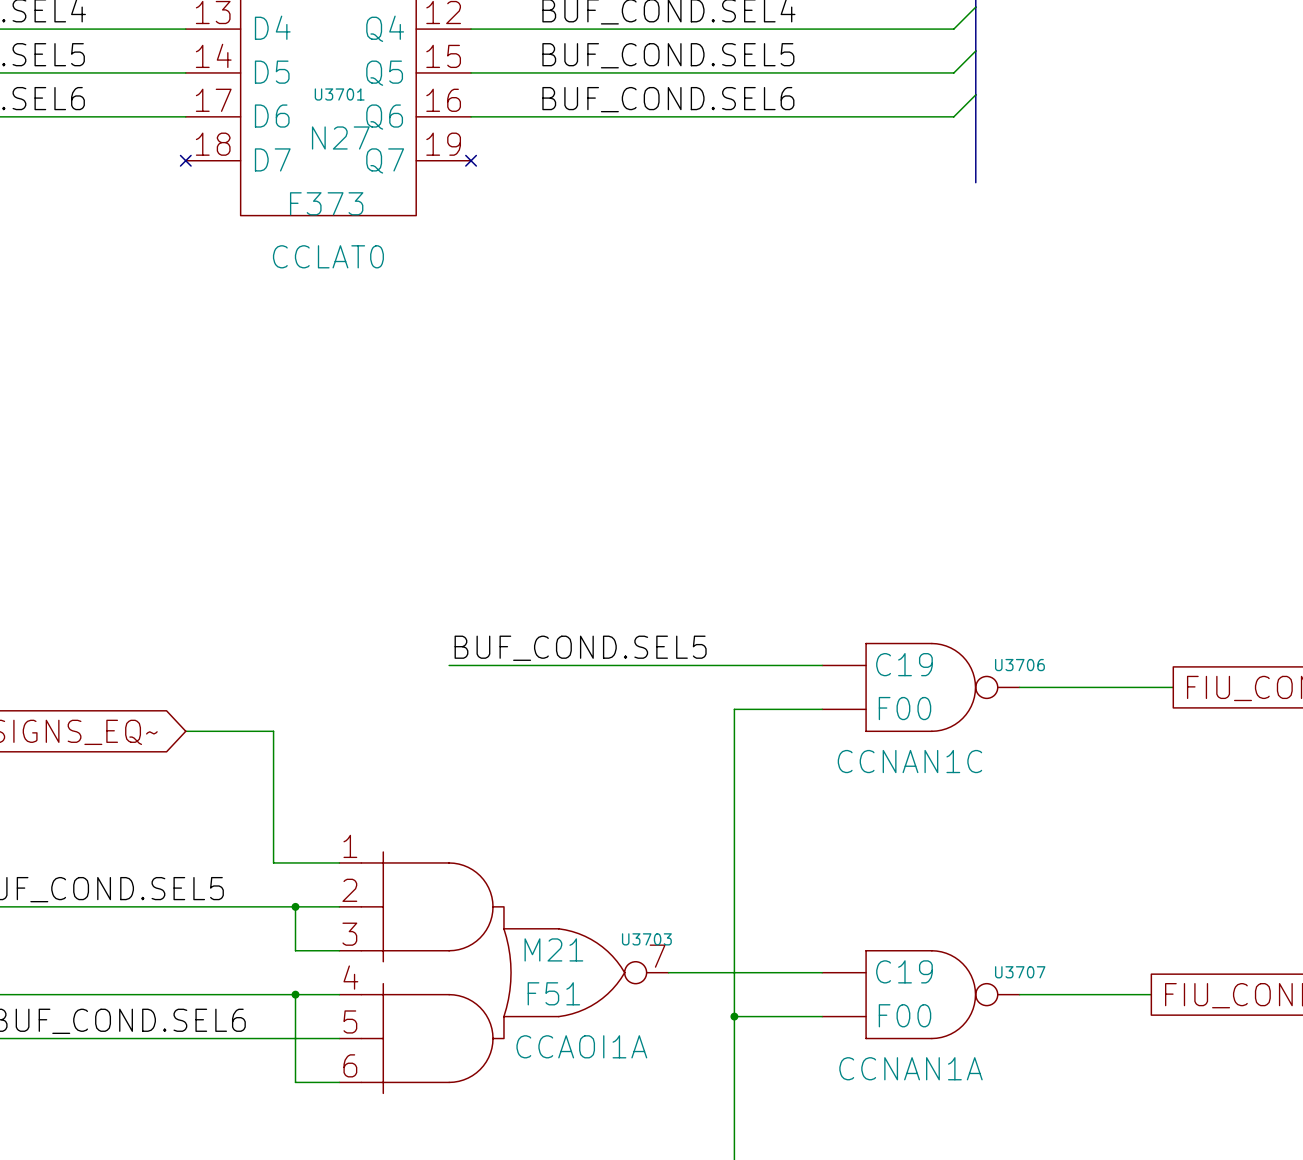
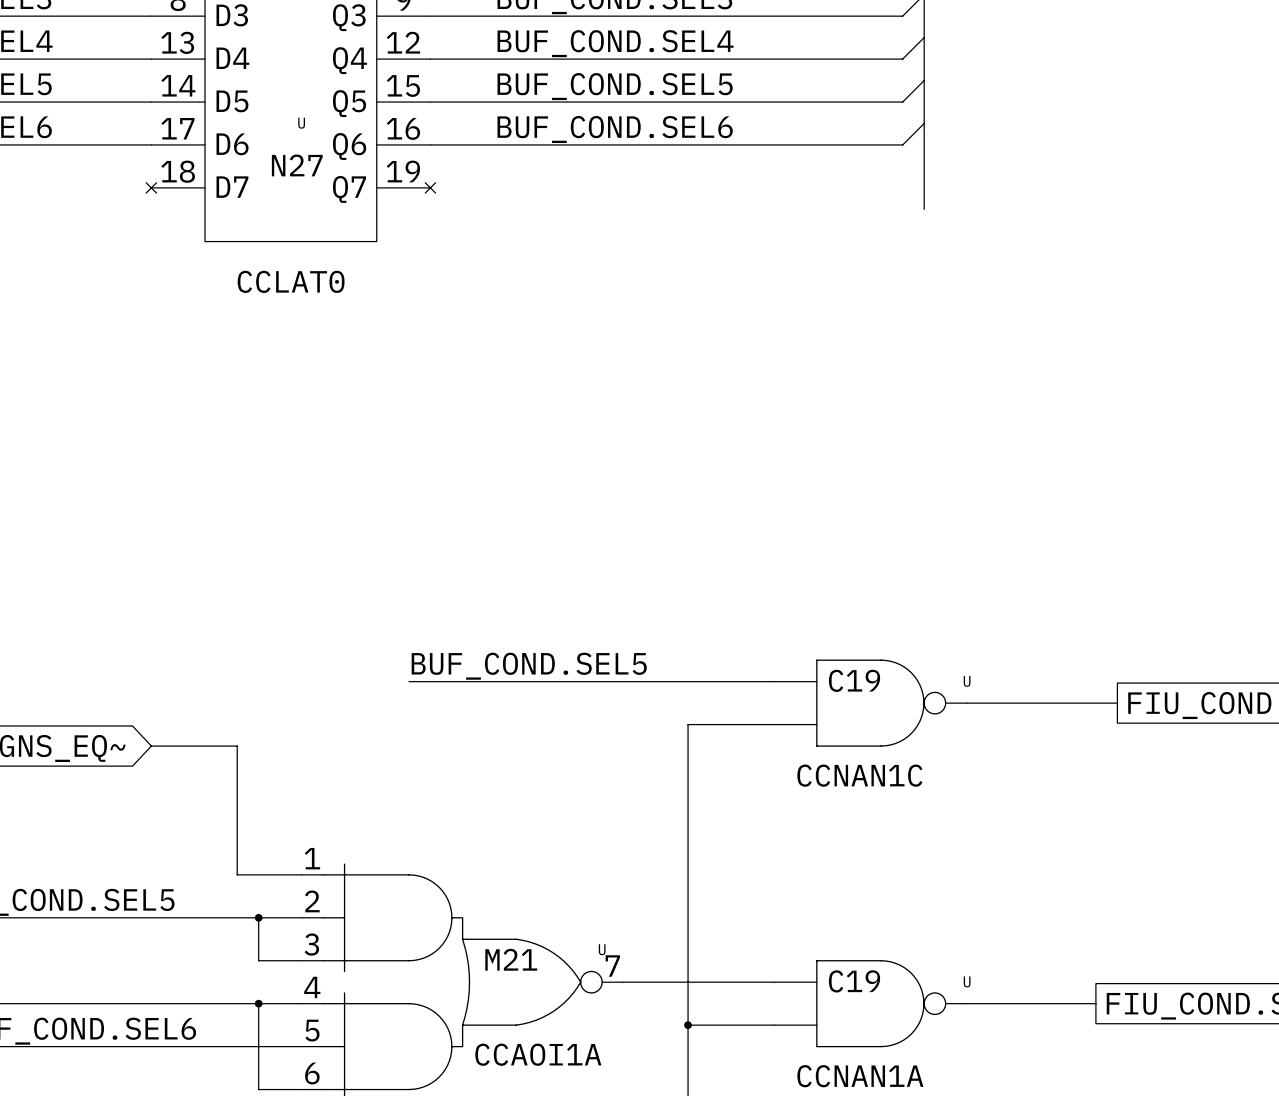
U3701 name: U3701 (339, 94) -> U (301, 123)
U3701 value: F373 (326, 203) -> none
U3706 name: U3706 (1019, 665) -> U (967, 681)
U3706 value: F00 (904, 708) -> none
U3703 name: U3703 (646, 939) -> U (602, 949)
U3707 name: U3707 (1020, 972) -> U (967, 981)
U3703 value: F51 (553, 993) -> none
U3707 value: F00 (904, 1015) -> none

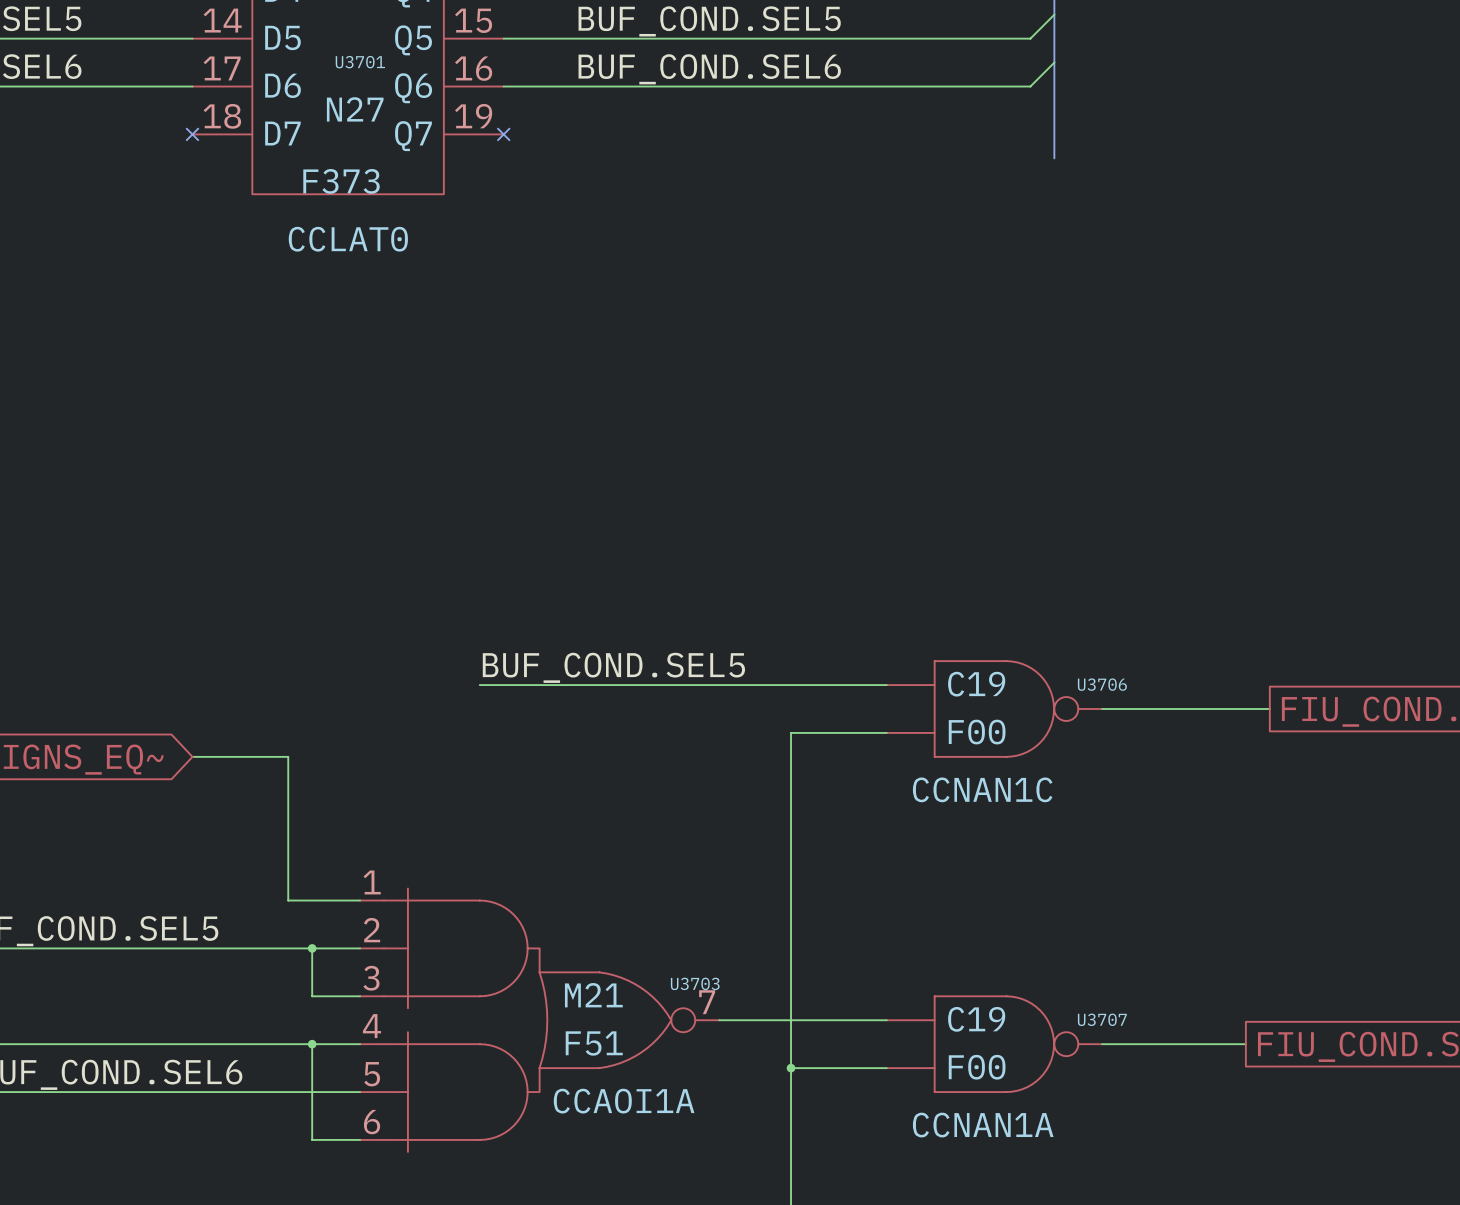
U name: U (301, 123) -> U3701 (360, 62)
U value: none -> F373 (341, 181)
U name: U (967, 681) -> U3706 (1102, 684)
U value: none -> F00 (977, 732)
U name: U (602, 949) -> U3703 (695, 983)
U name: U (967, 981) -> U3707 (1102, 1019)
U value: none -> F51 (594, 1043)
U value: none -> F00 (977, 1067)

